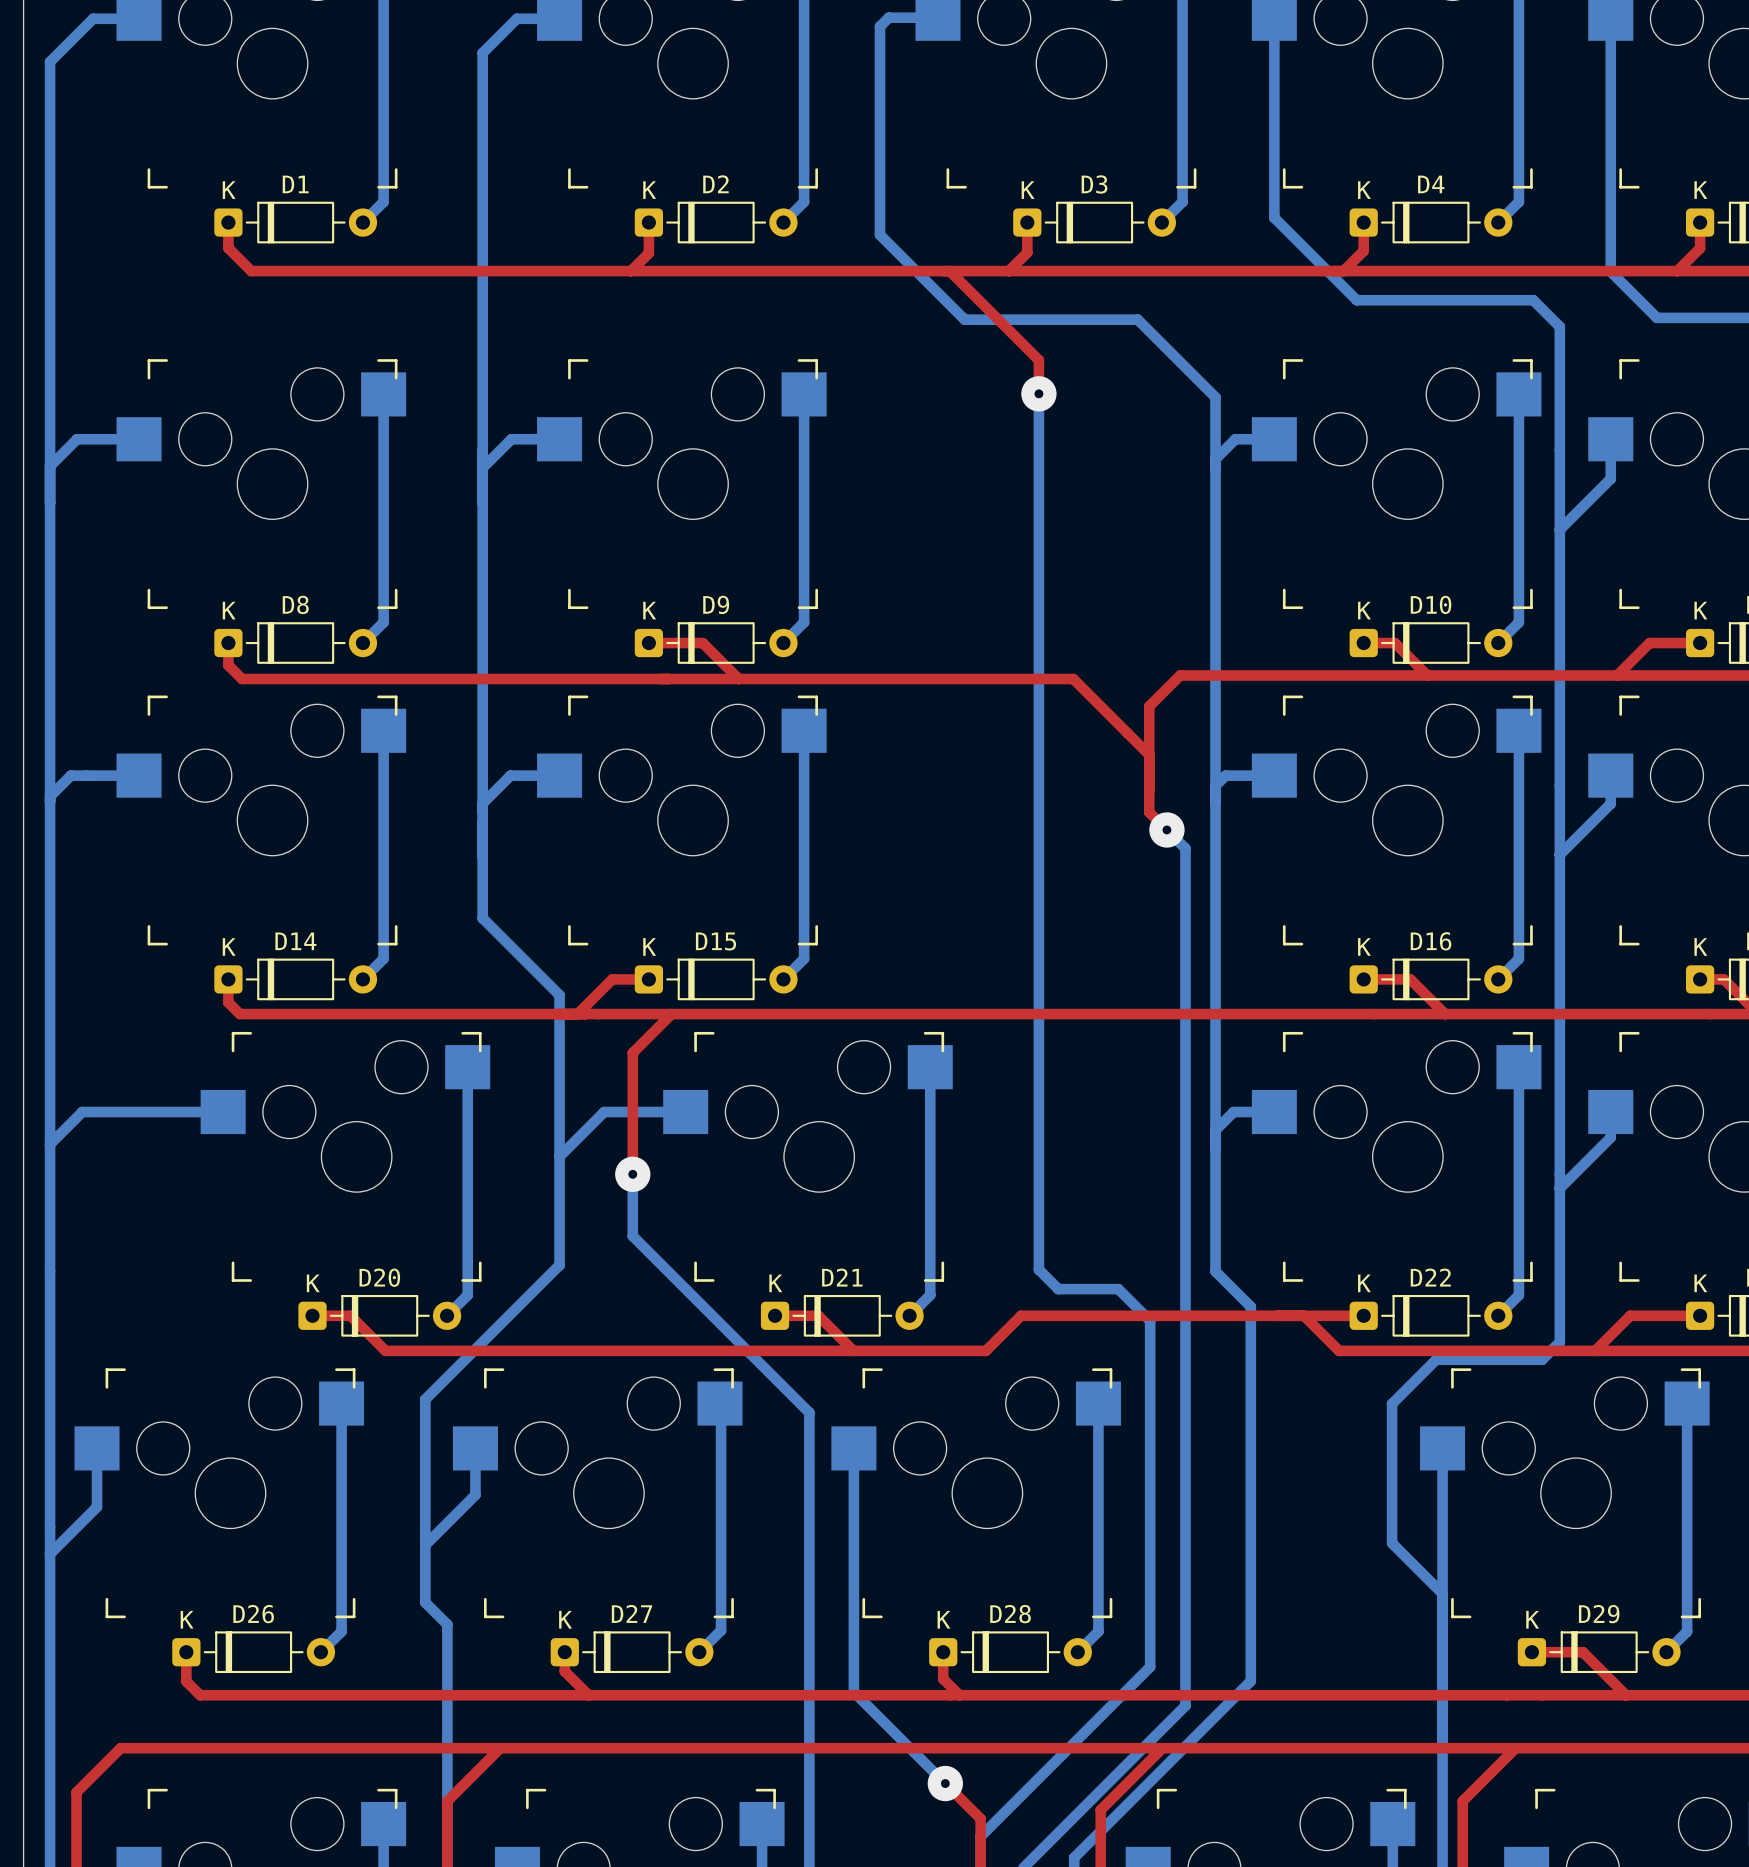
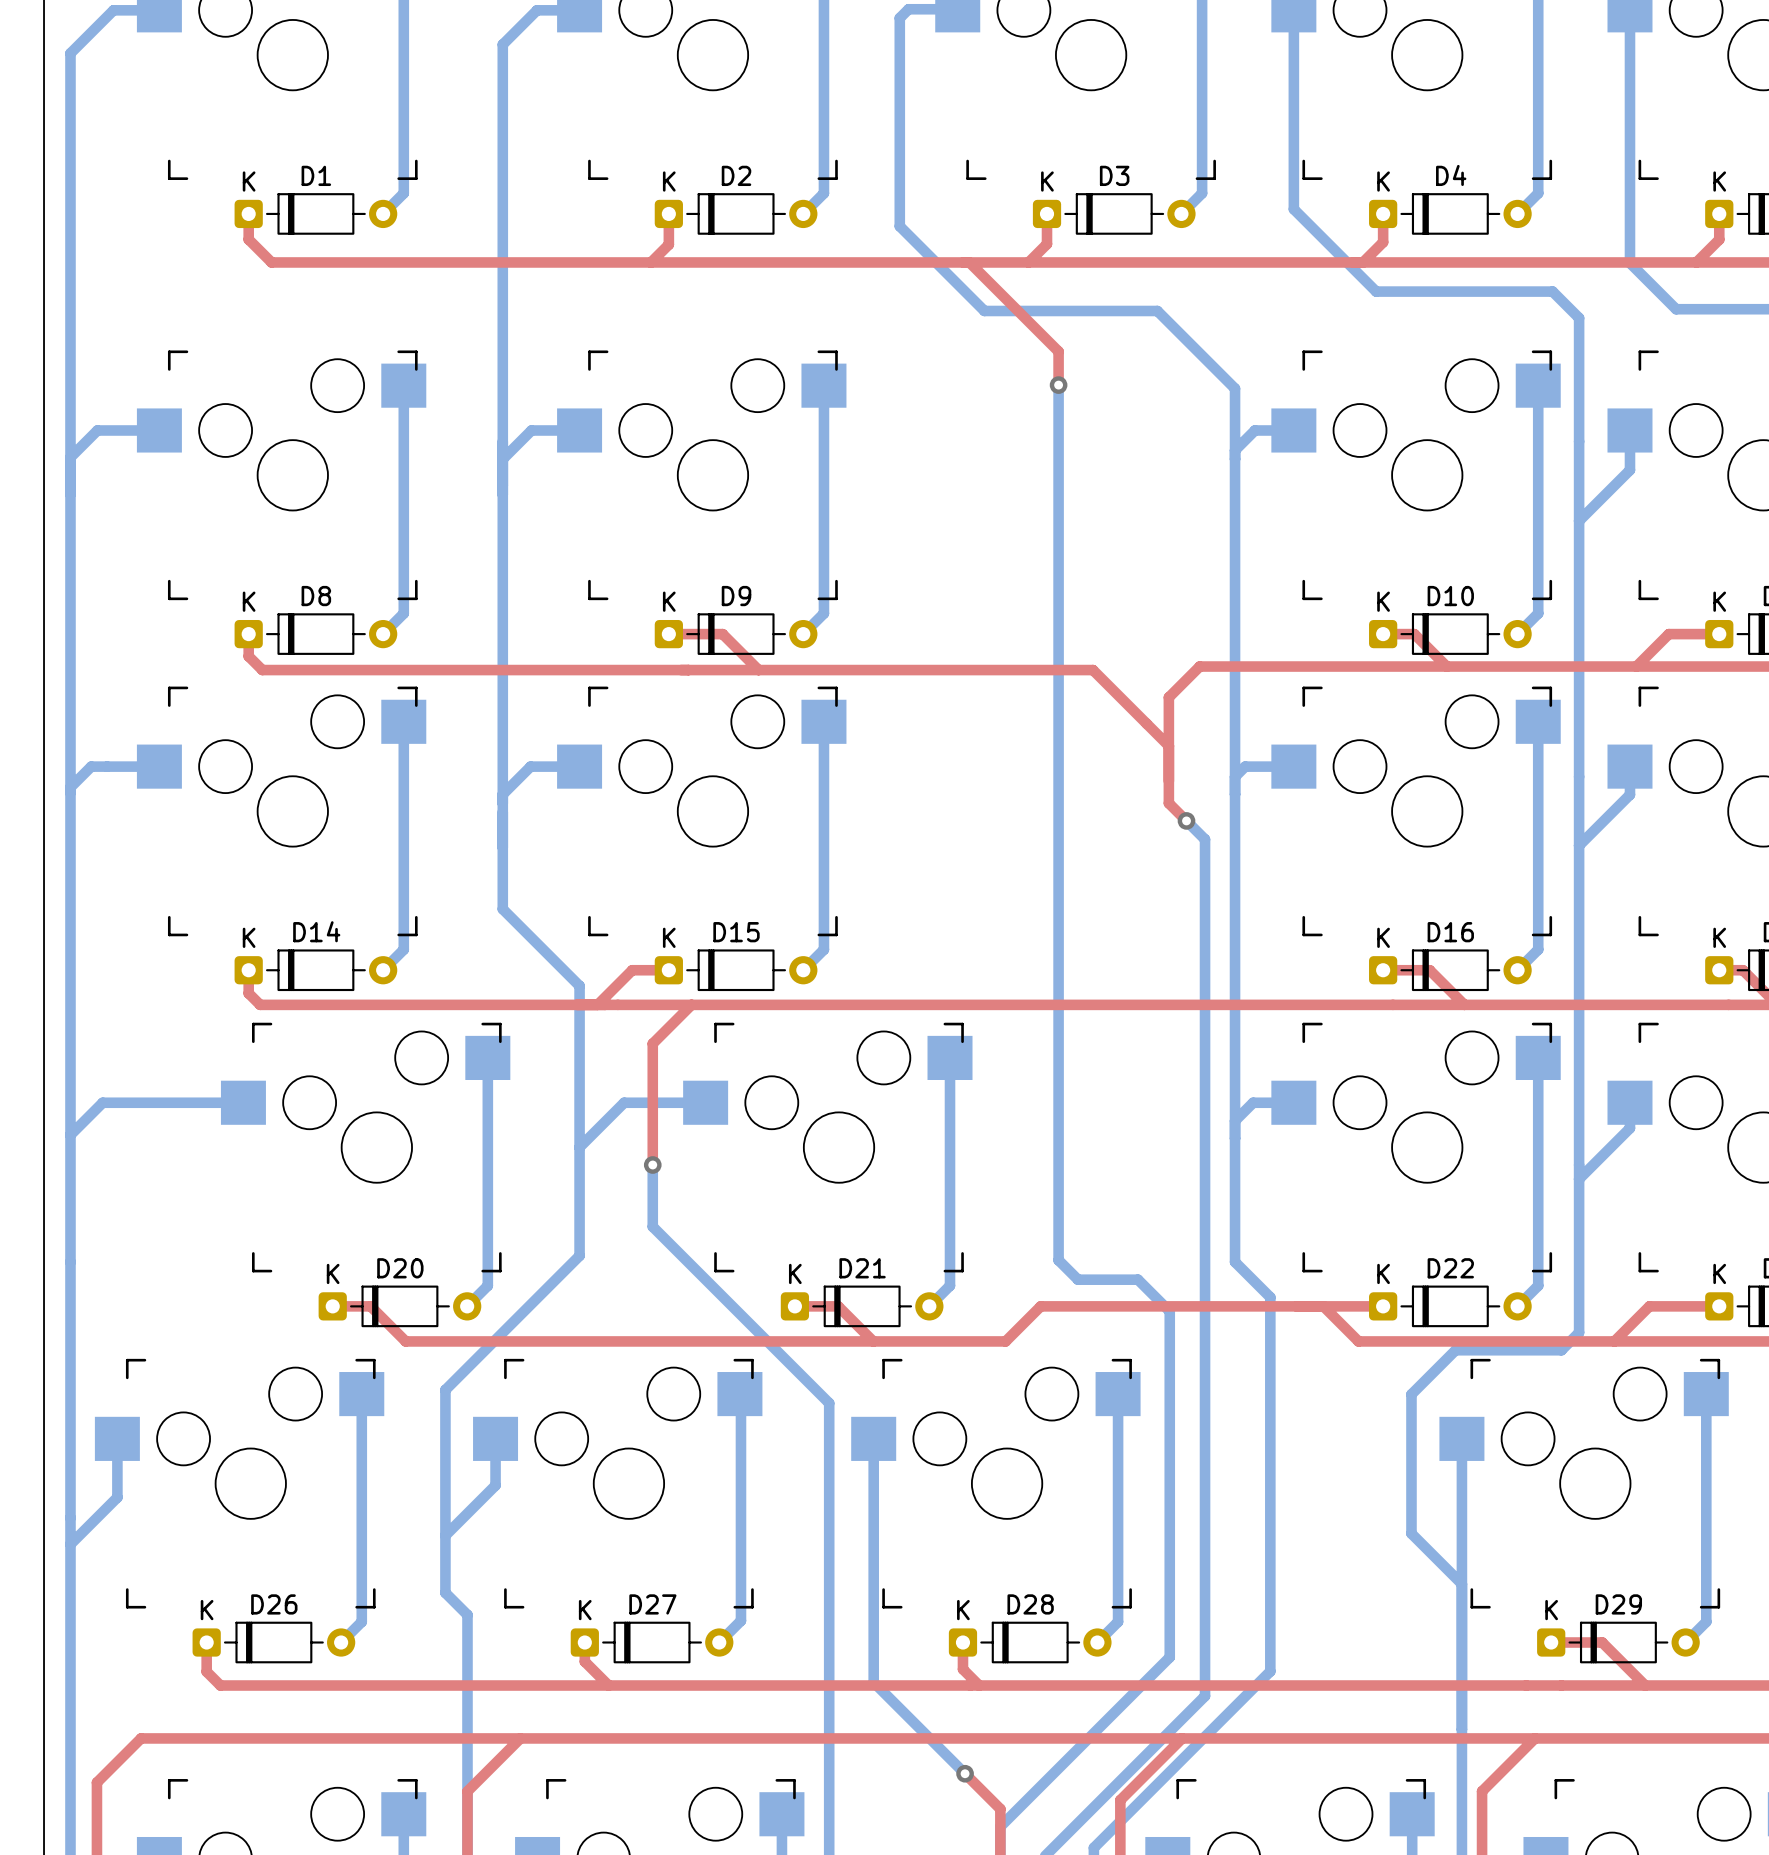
via size: [1021, 376, 1057, 412] -> [1049, 376, 1068, 394]
via size: [1149, 812, 1185, 848] -> [1177, 812, 1196, 830]
via size: [615, 1156, 651, 1192] -> [643, 1156, 662, 1174]
via size: [927, 1765, 963, 1802] -> [956, 1764, 974, 1783]

